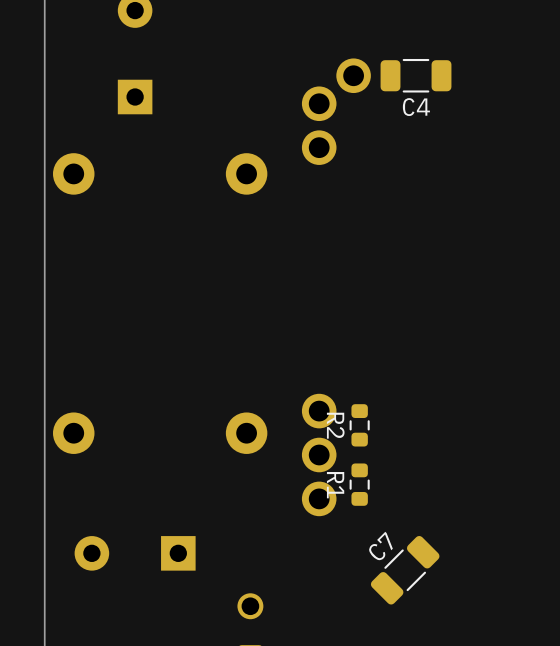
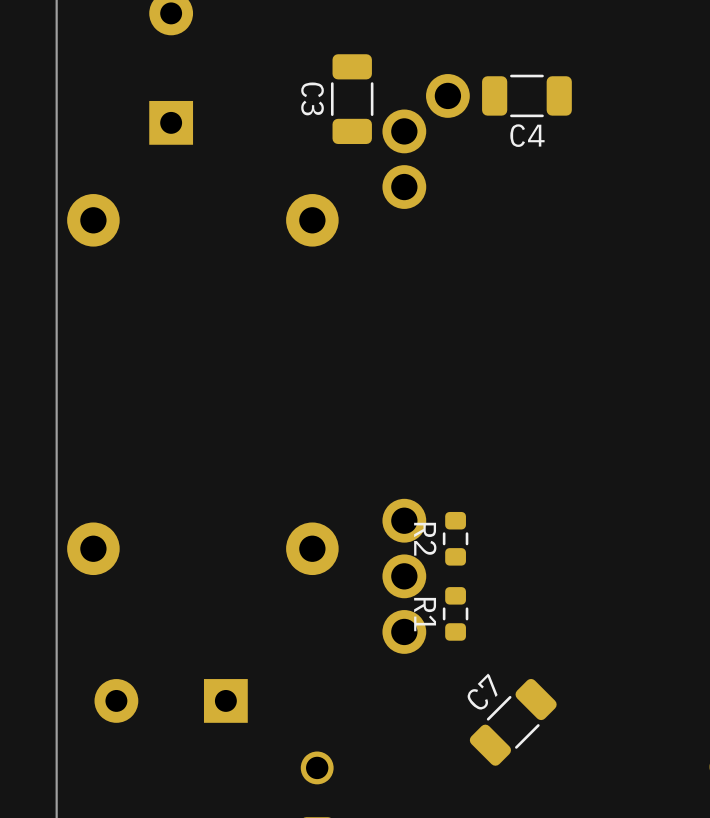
C3: none -> (352, 99)

